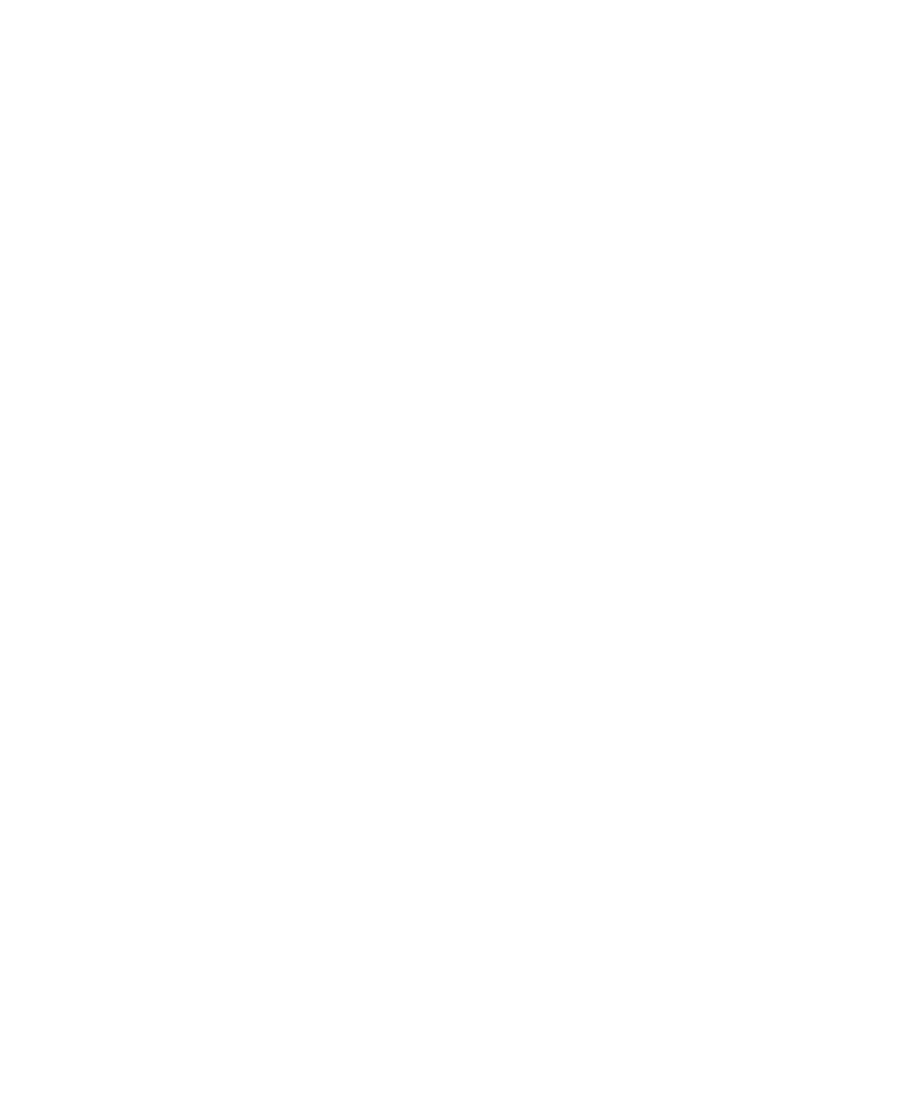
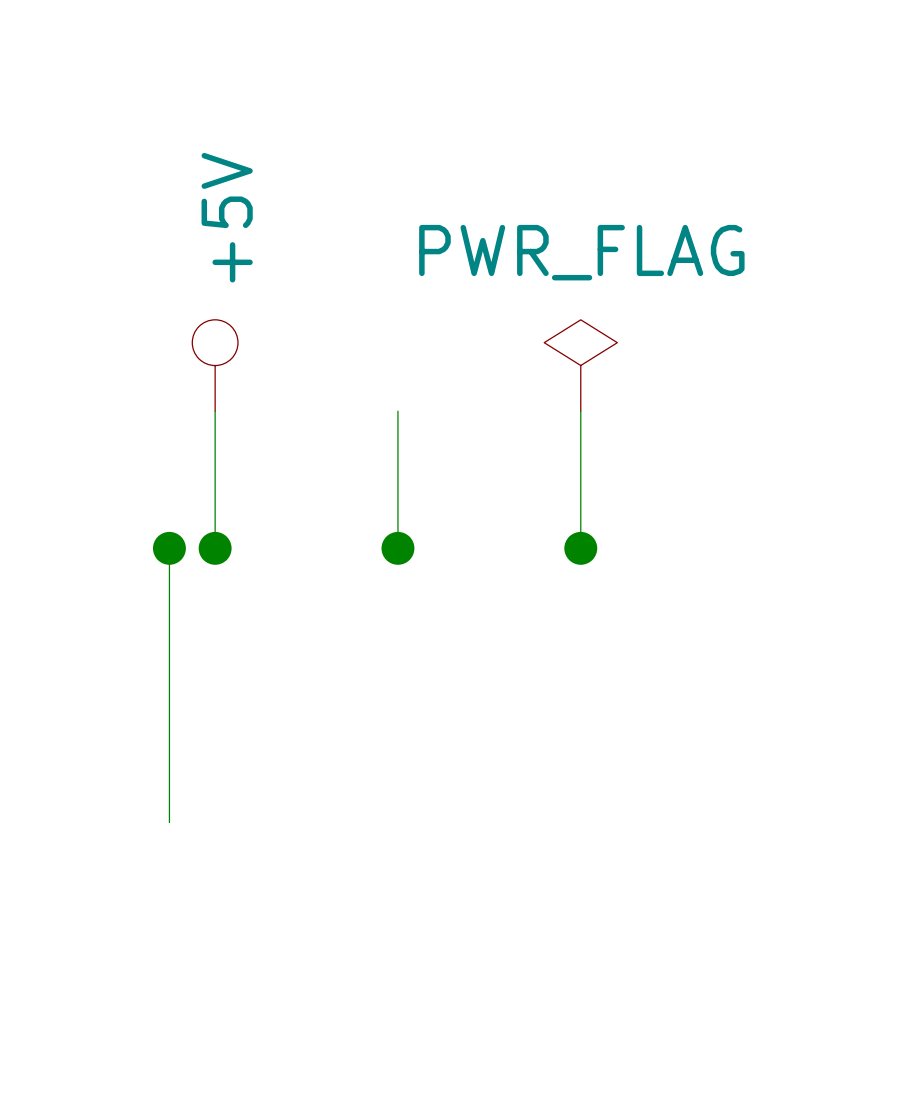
power symbol: none -> +5V (215, 365)
power symbol: none -> PWR_FLAG (580, 365)
wire: none -> (215, 411) (215, 548)
wire: none -> (397, 411) (397, 548)
wire: none -> (580, 411) (580, 548)
wire: none -> (169, 548) (169, 822)
junction: none -> (169, 548)
junction: none -> (215, 548)
junction: none -> (397, 548)
junction: none -> (580, 548)

